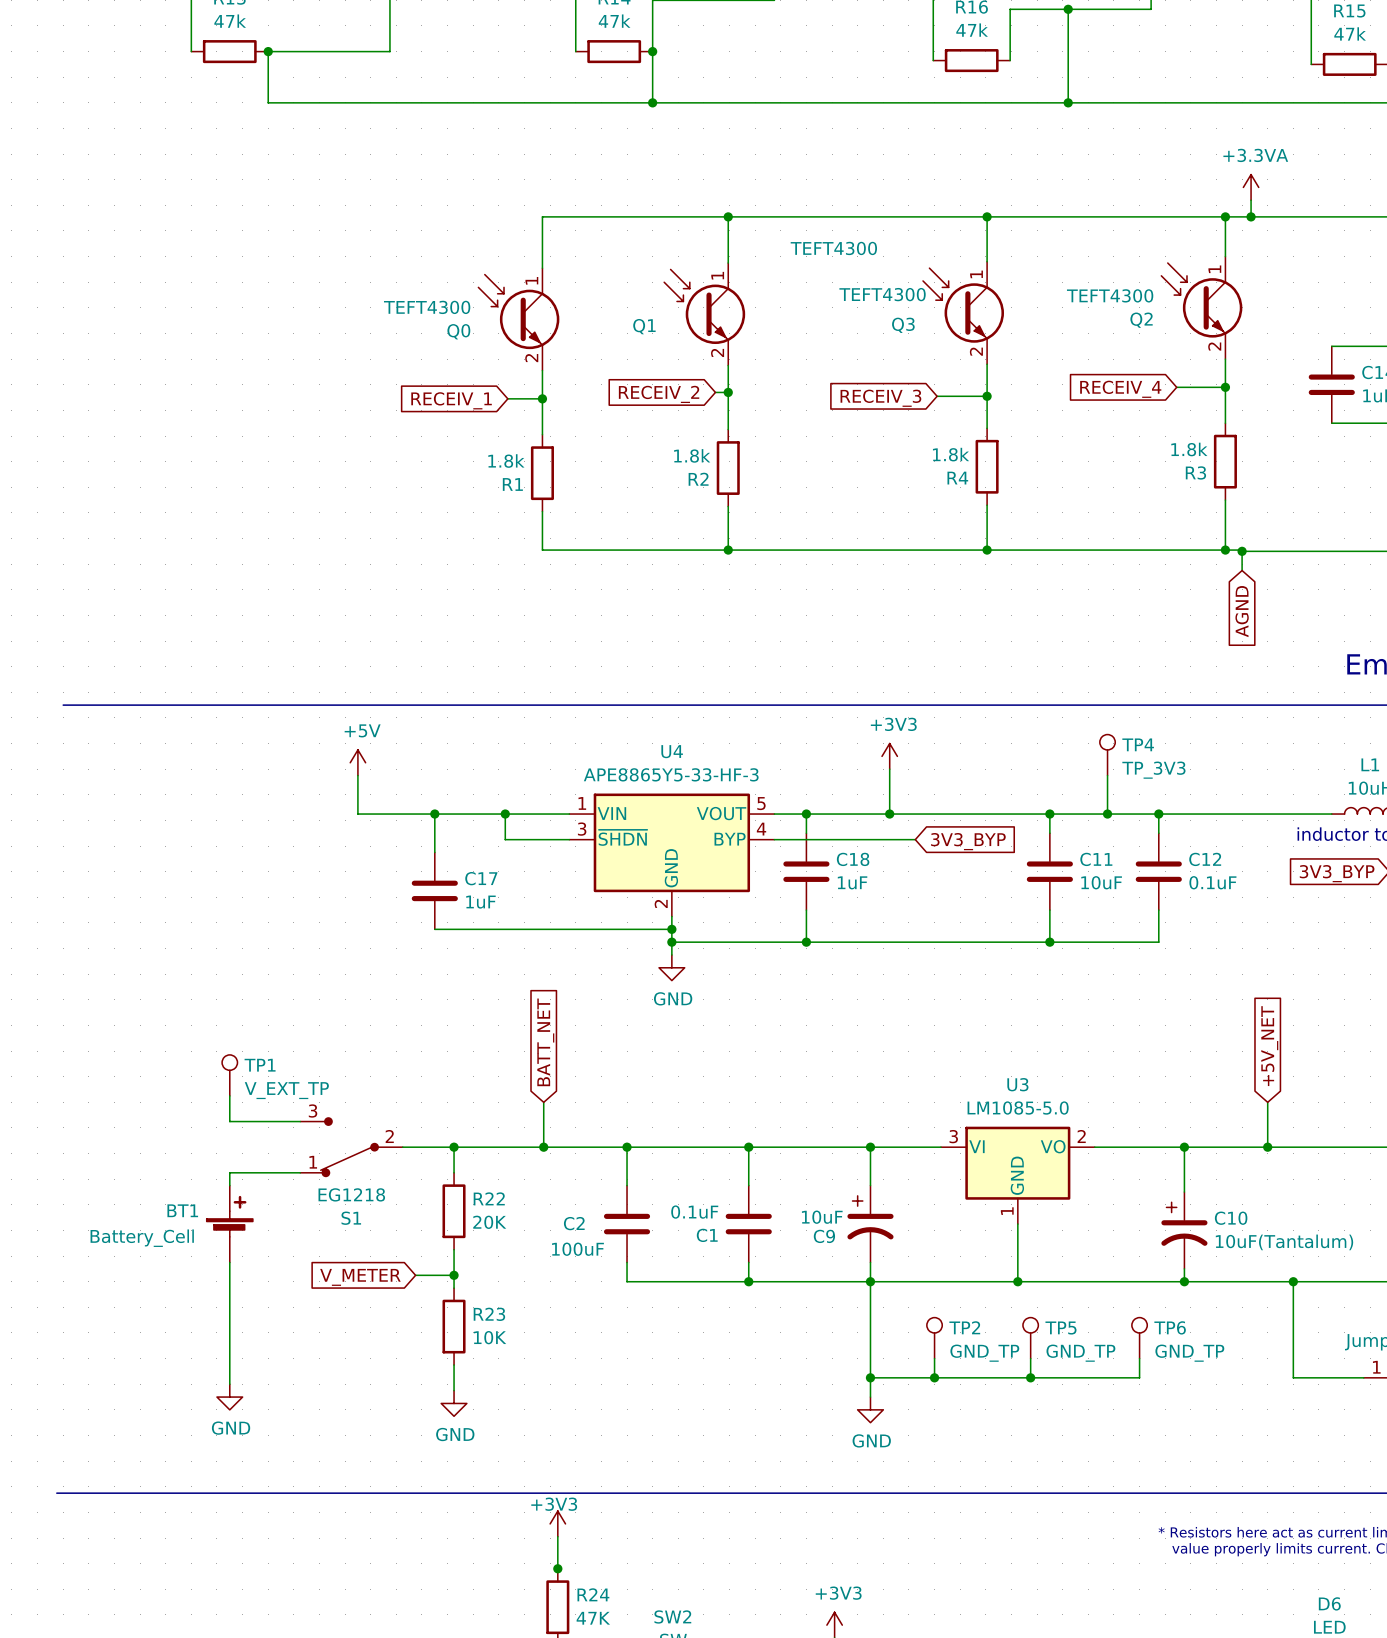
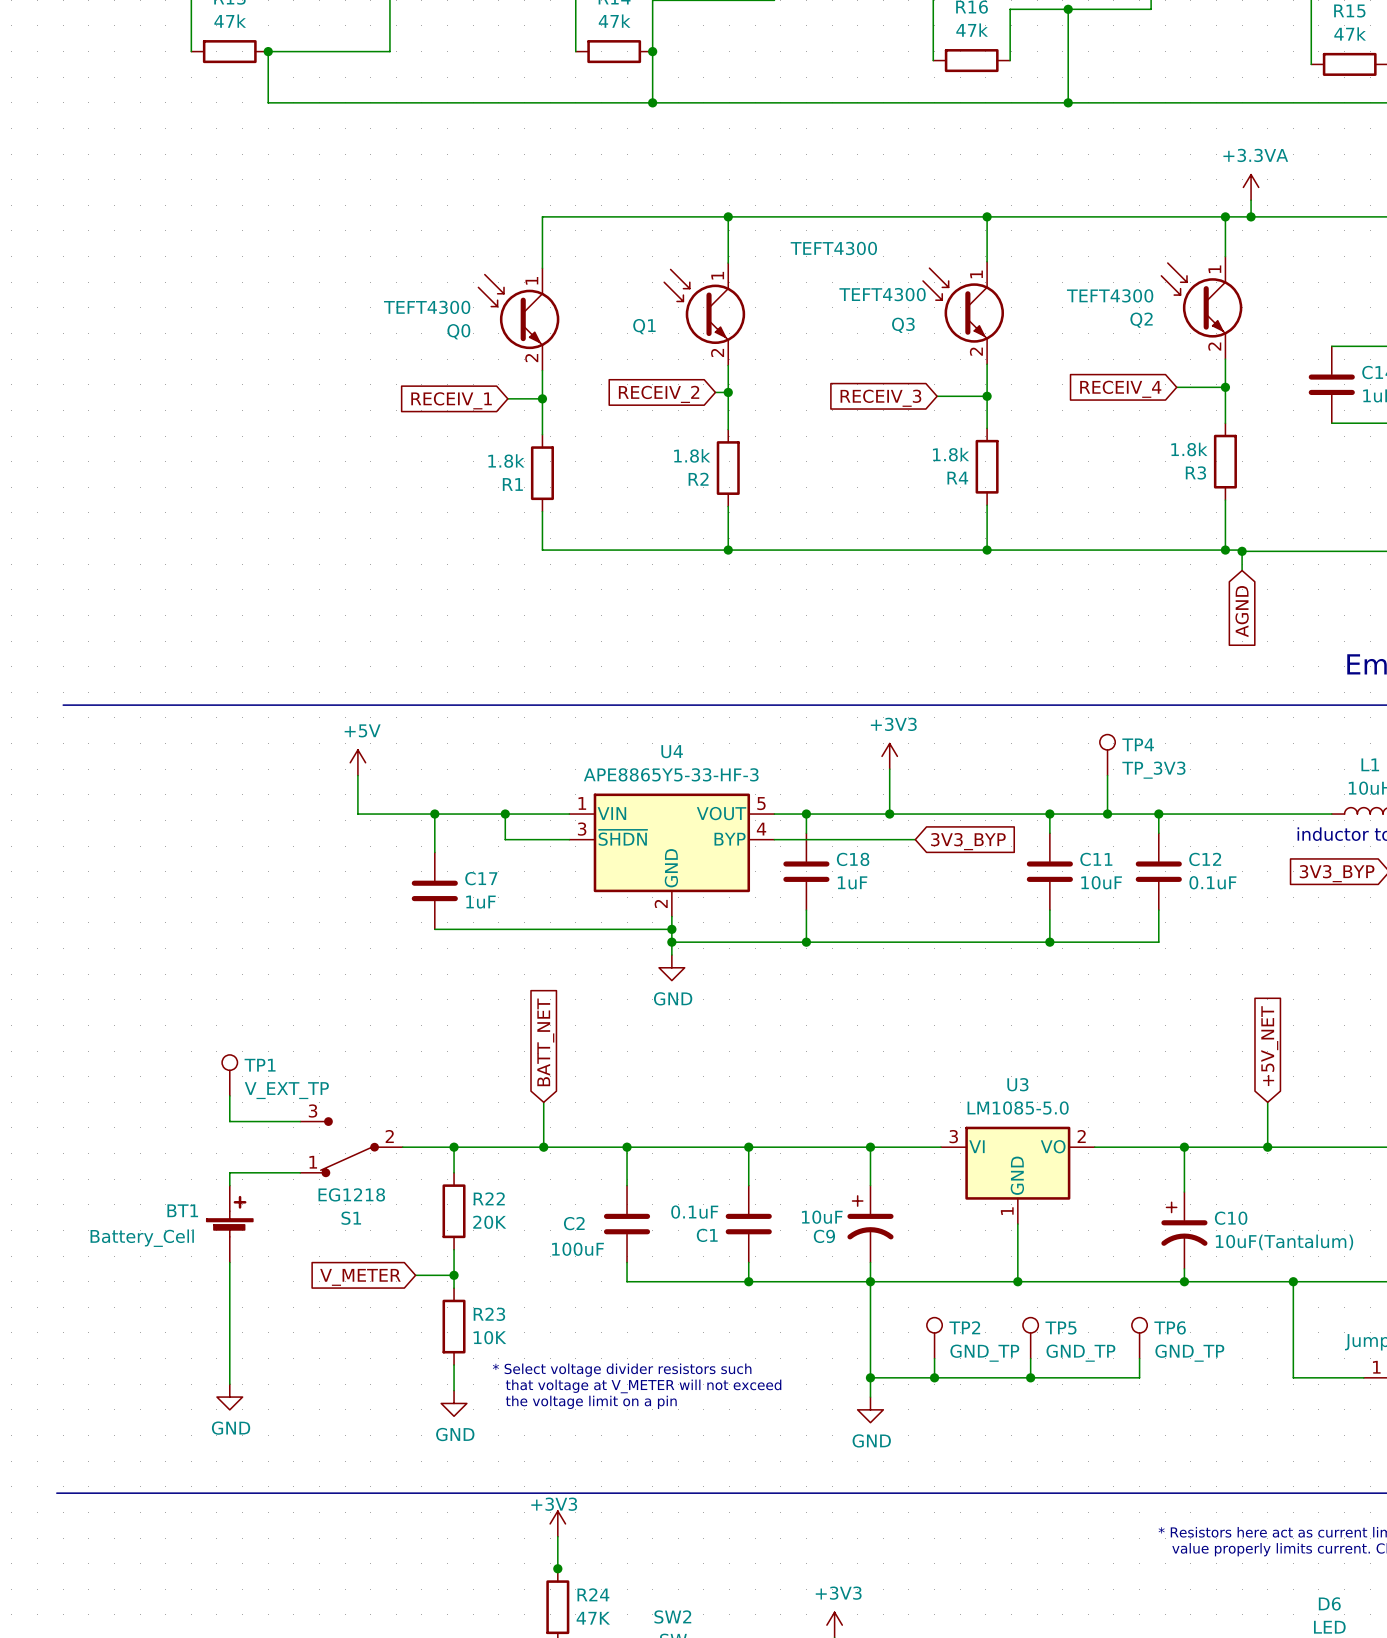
text: none -> * Select voltage divider resistors such (622, 1370)
text: none -> that voltage at V_METER will not exceed (643, 1386)
text: none -> the voltage limit on a pin (591, 1402)

